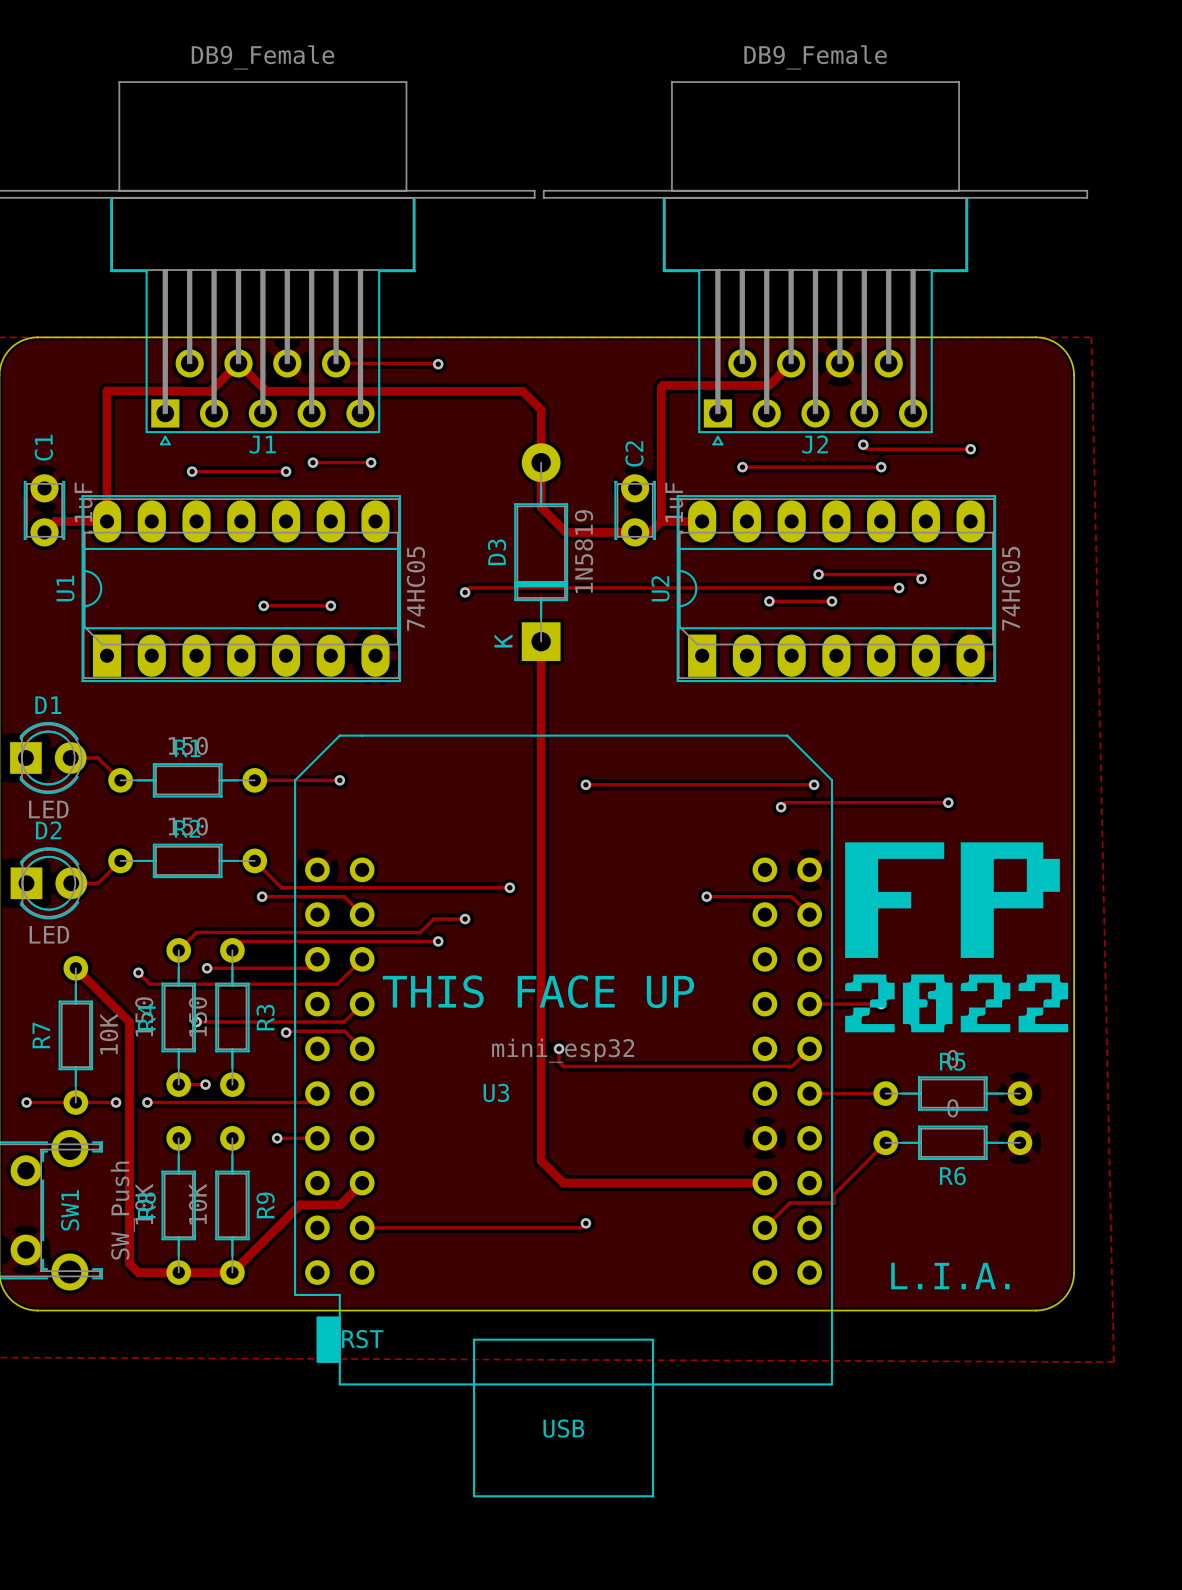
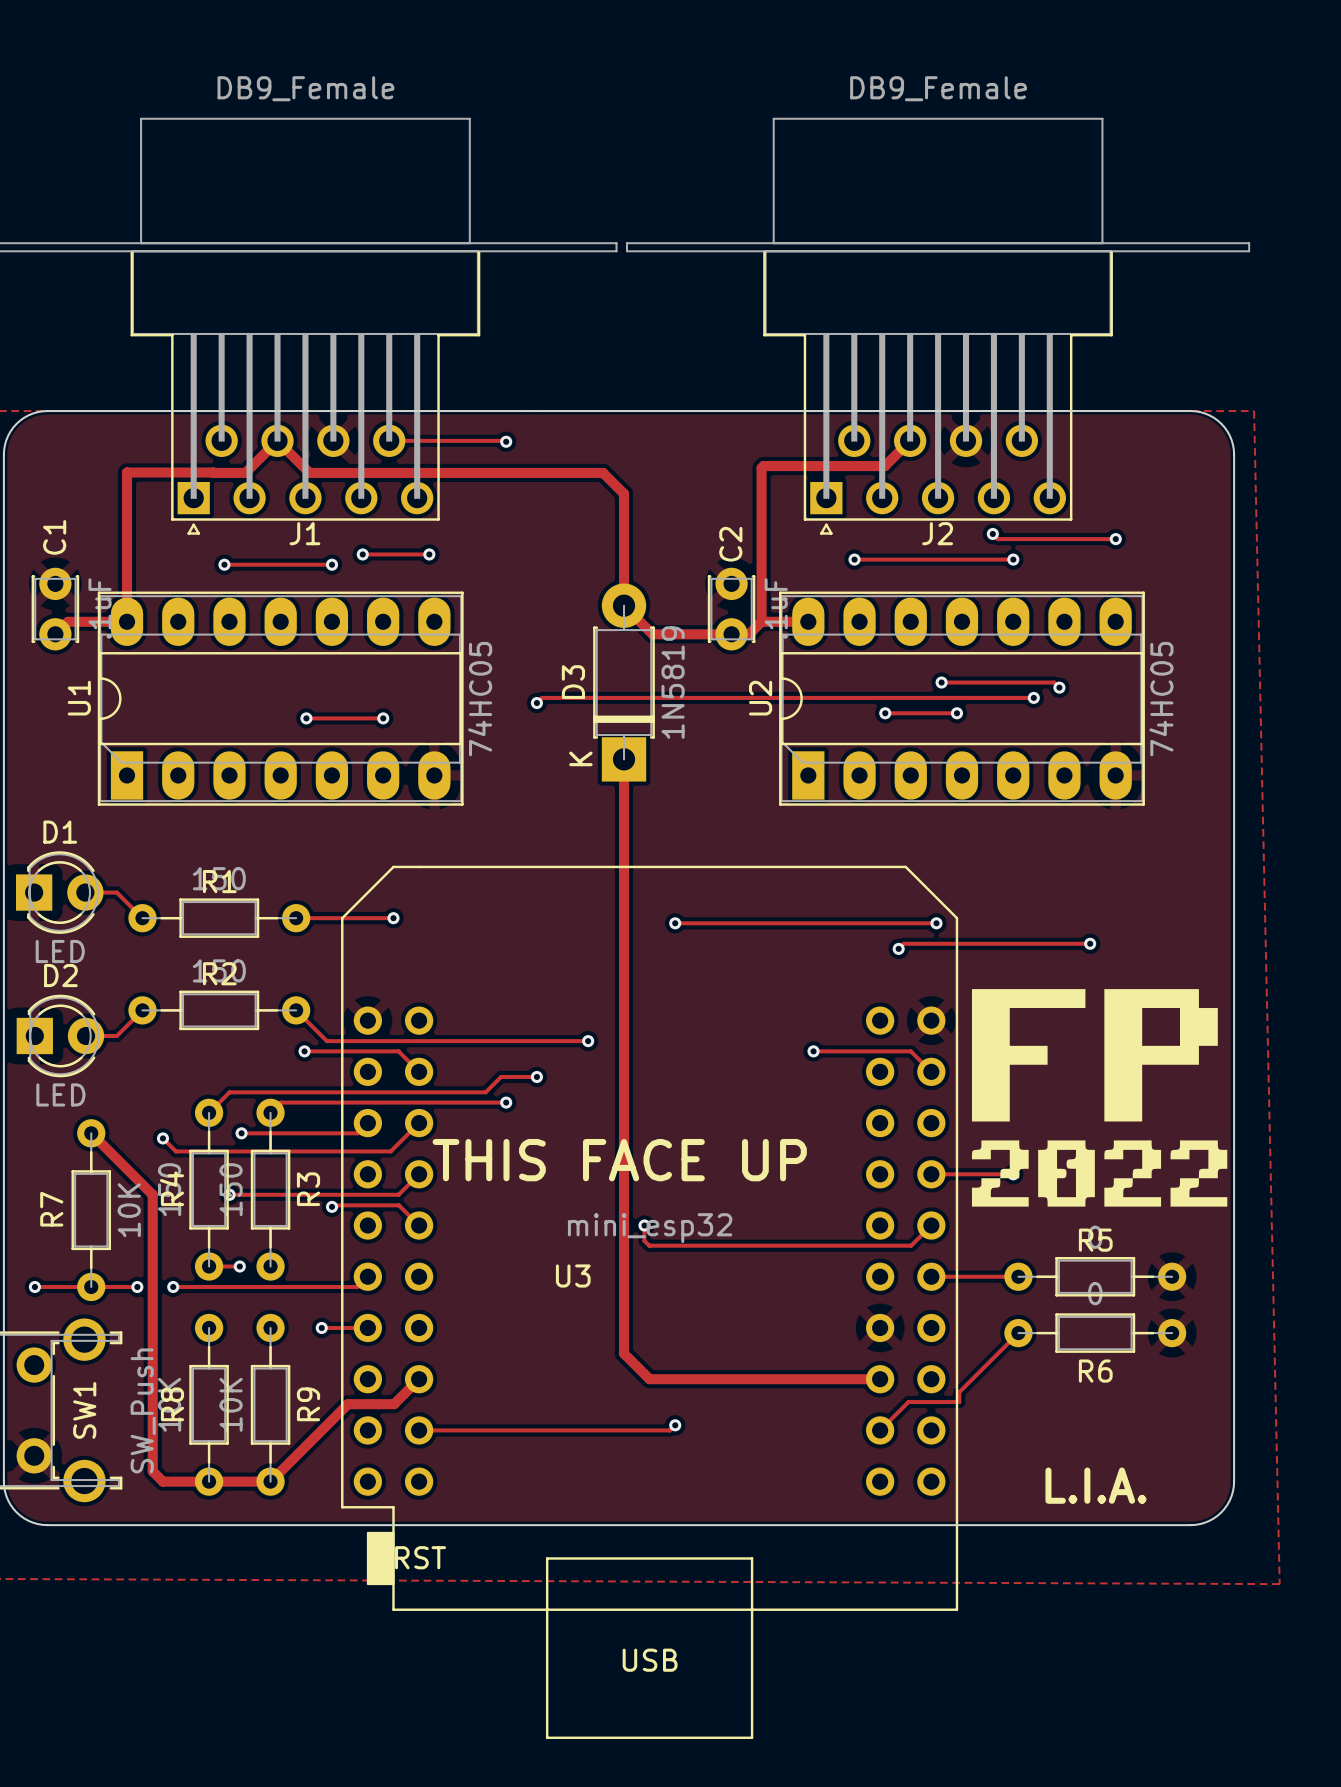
D3 footprint: [514, 443, 569, 662] -> [593, 583, 655, 782]

